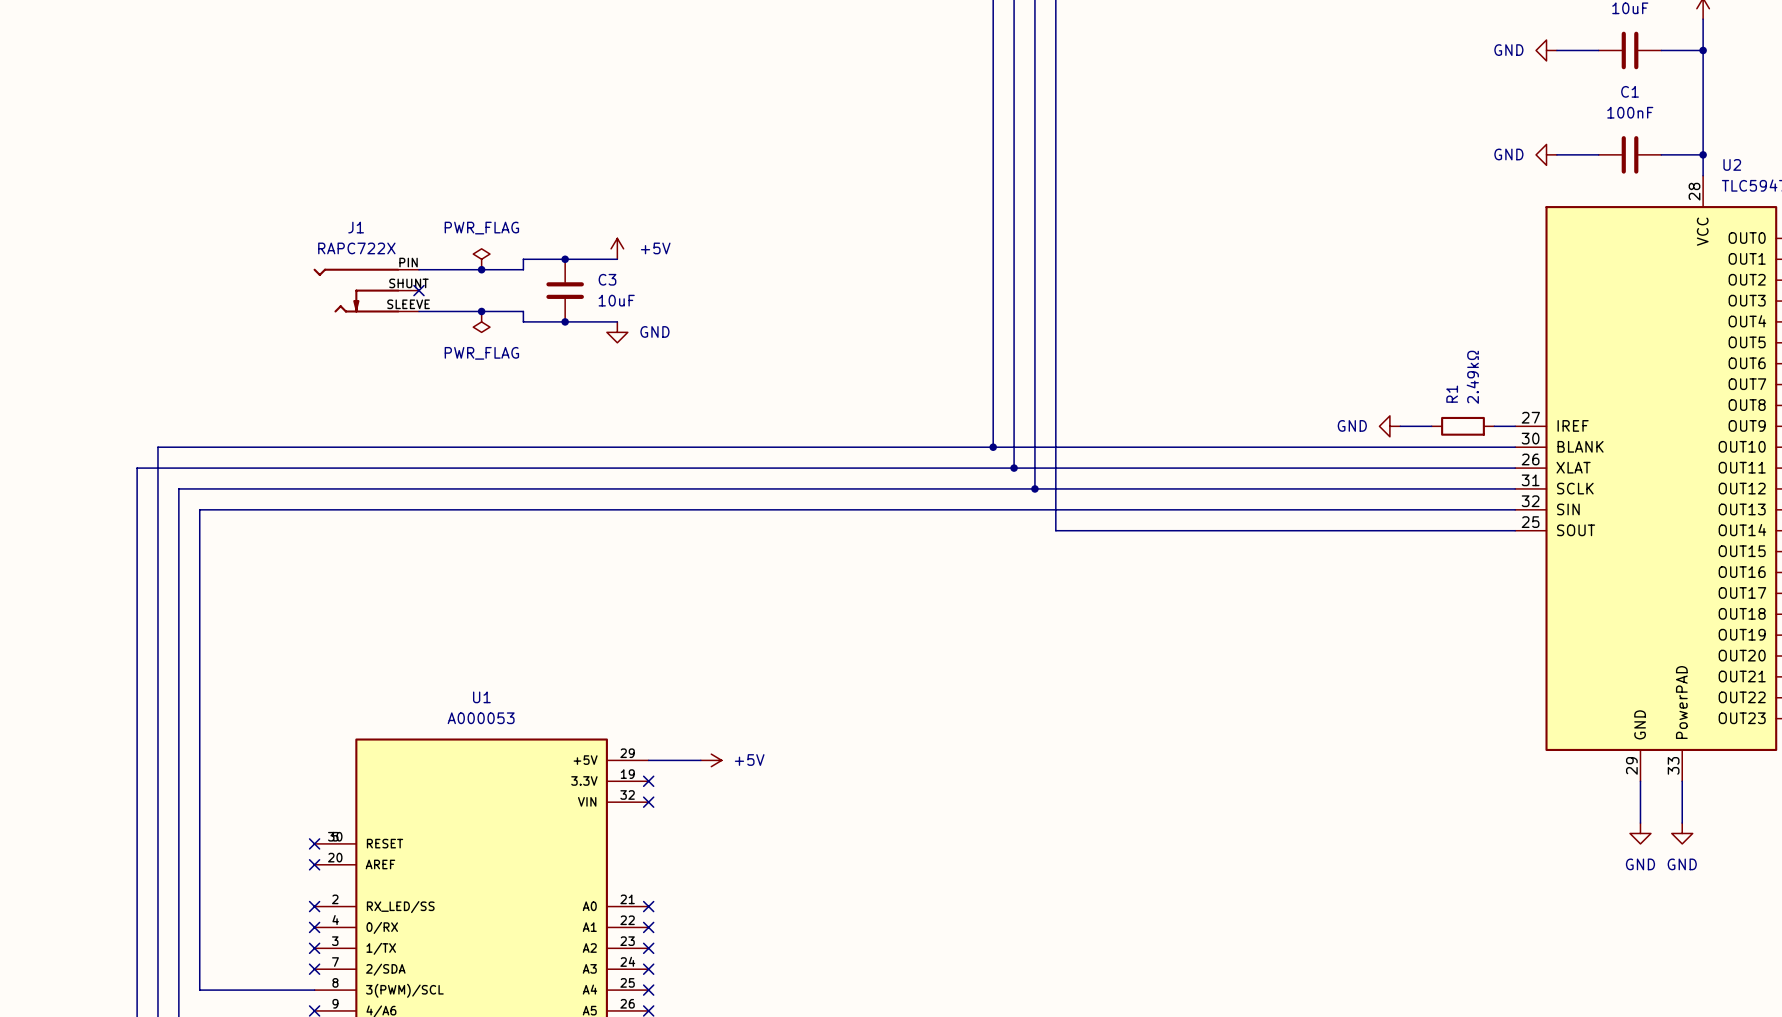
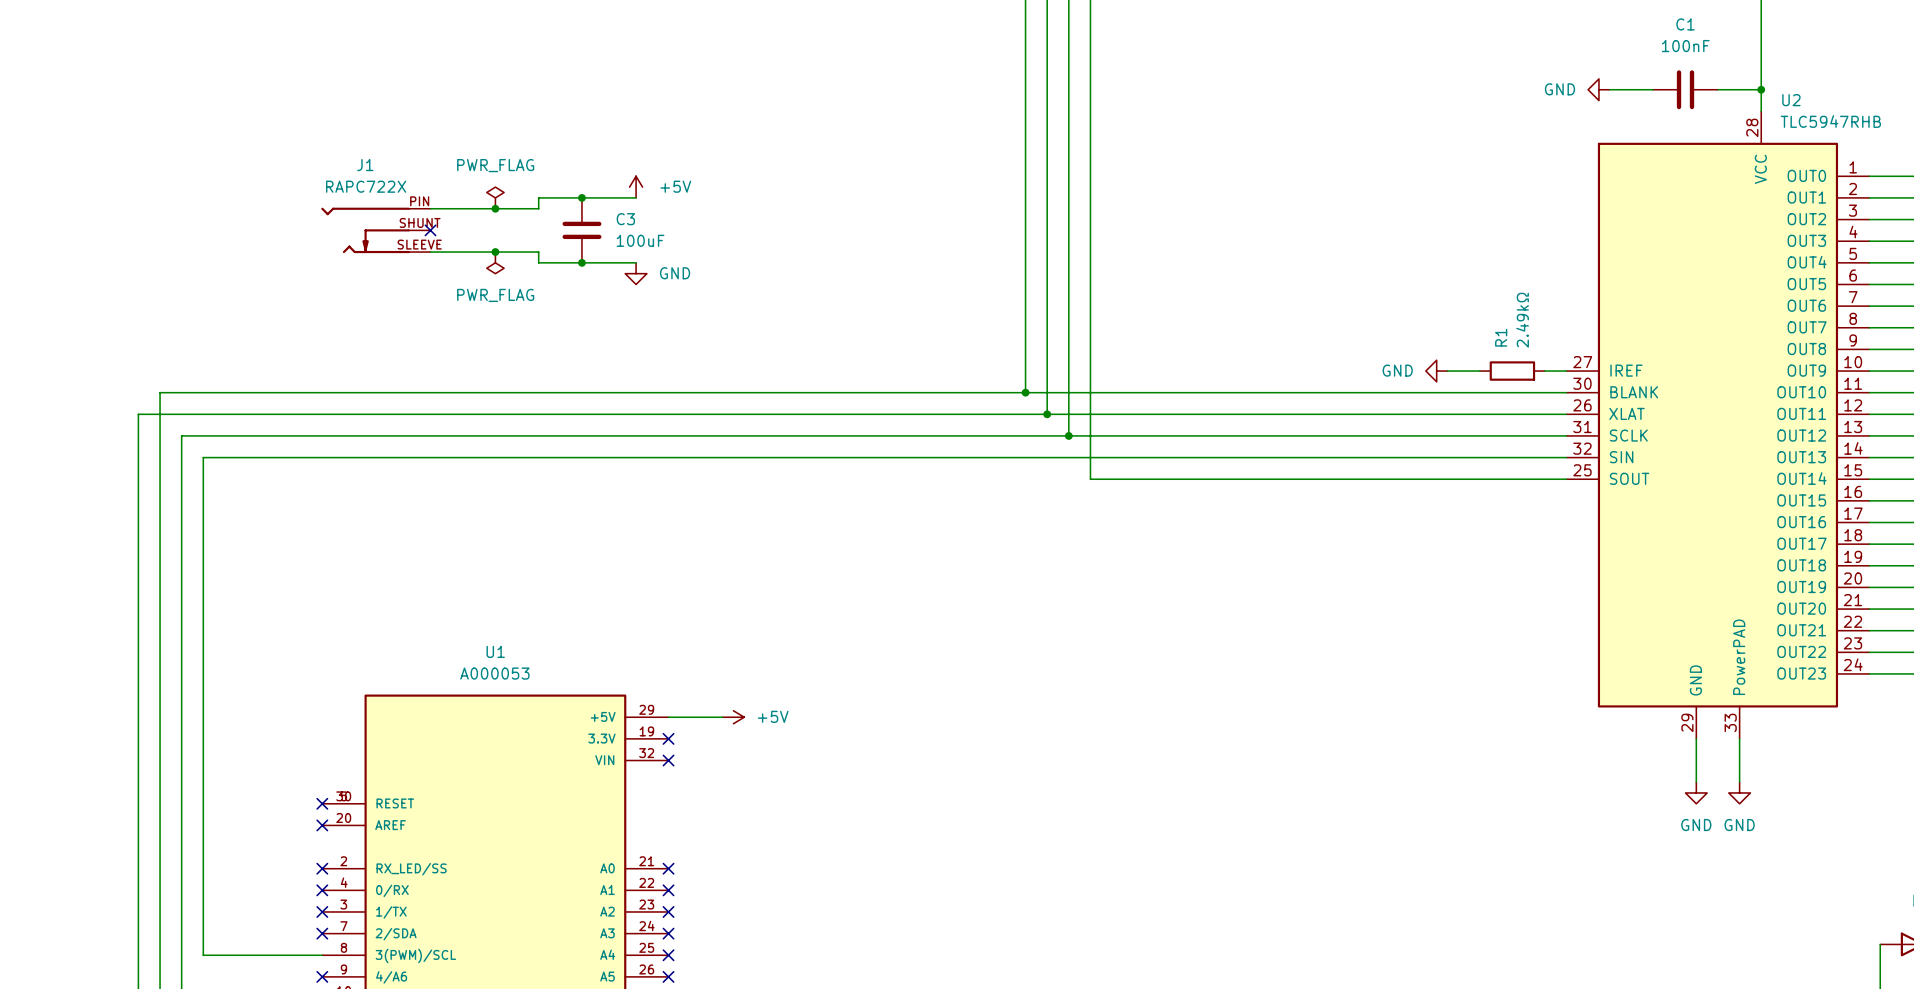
C3 value: 10uF (616, 300) -> 100uF (640, 240)

